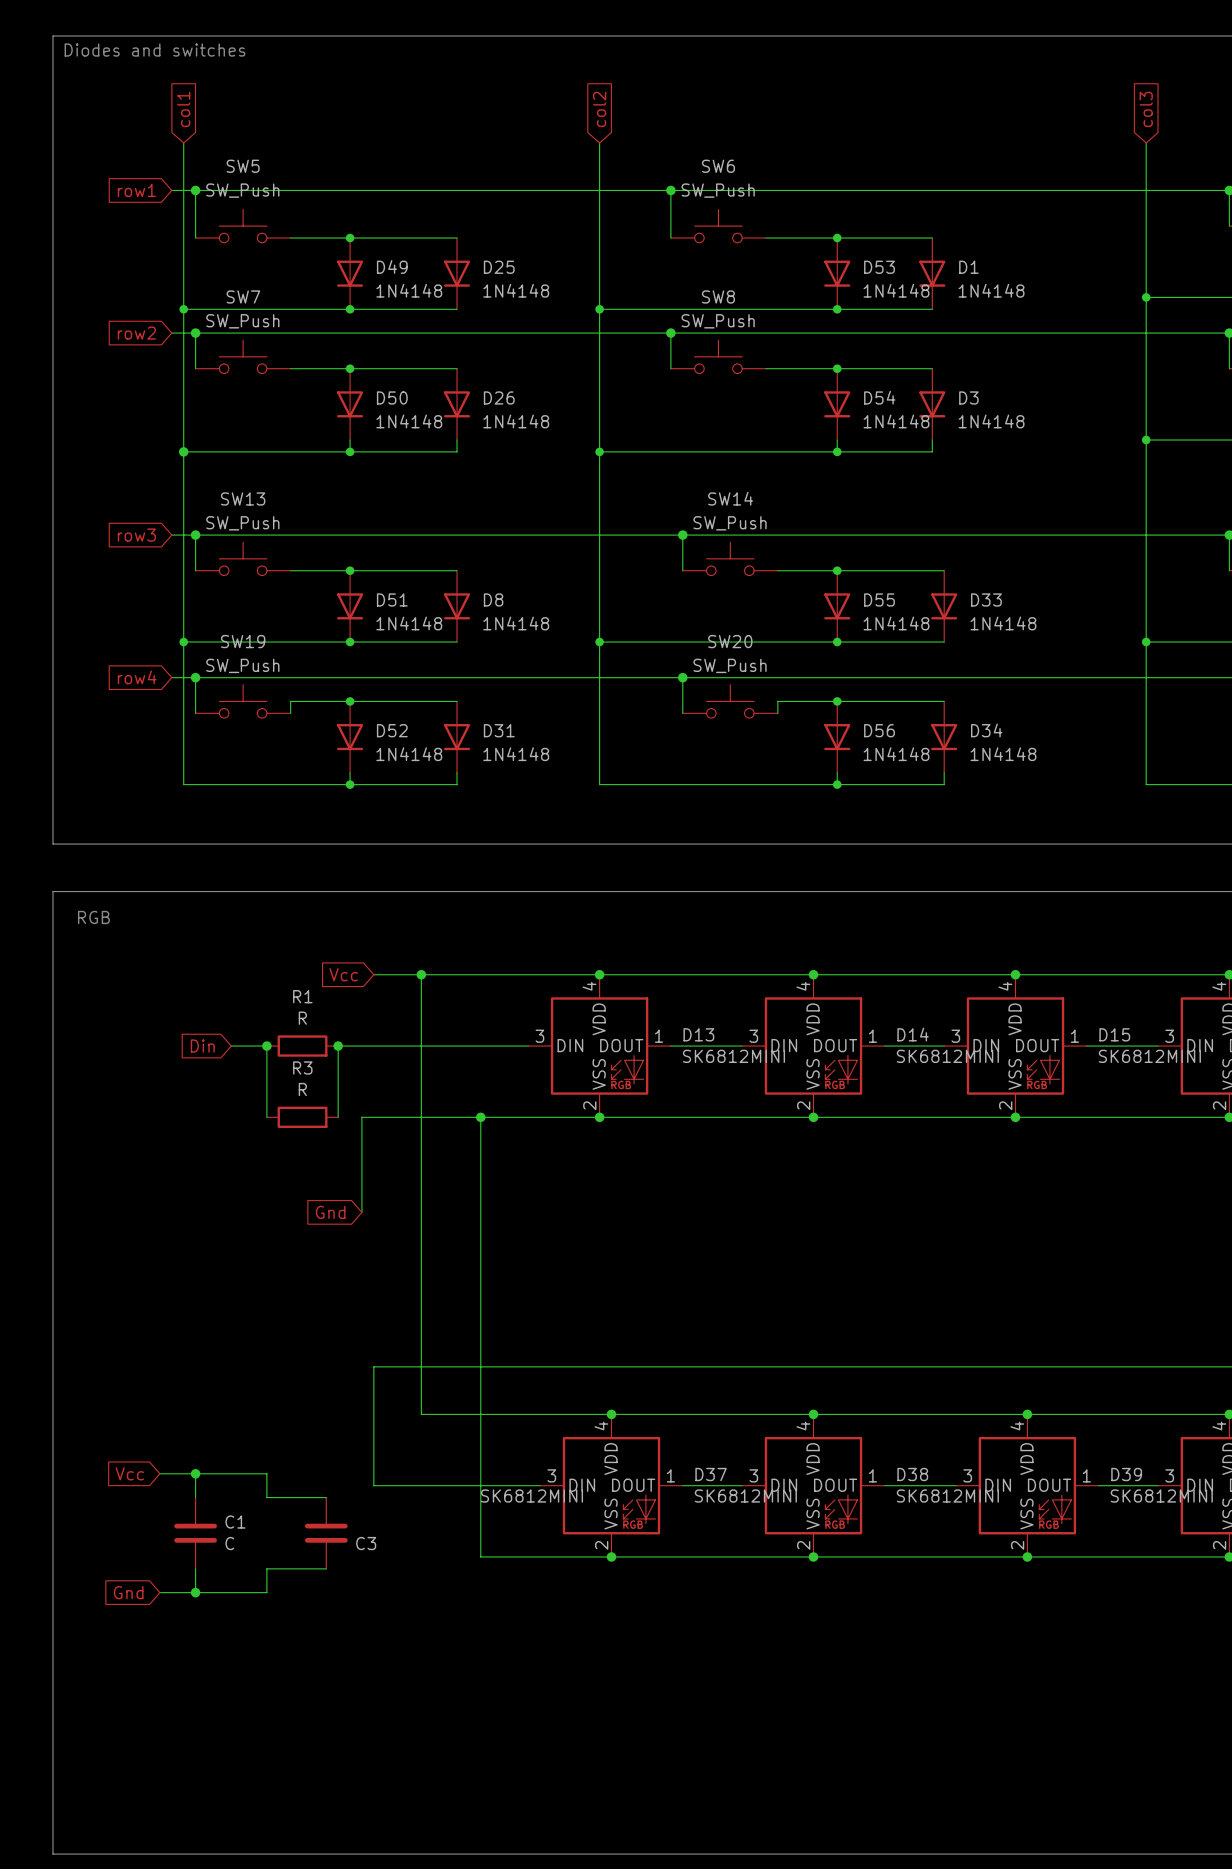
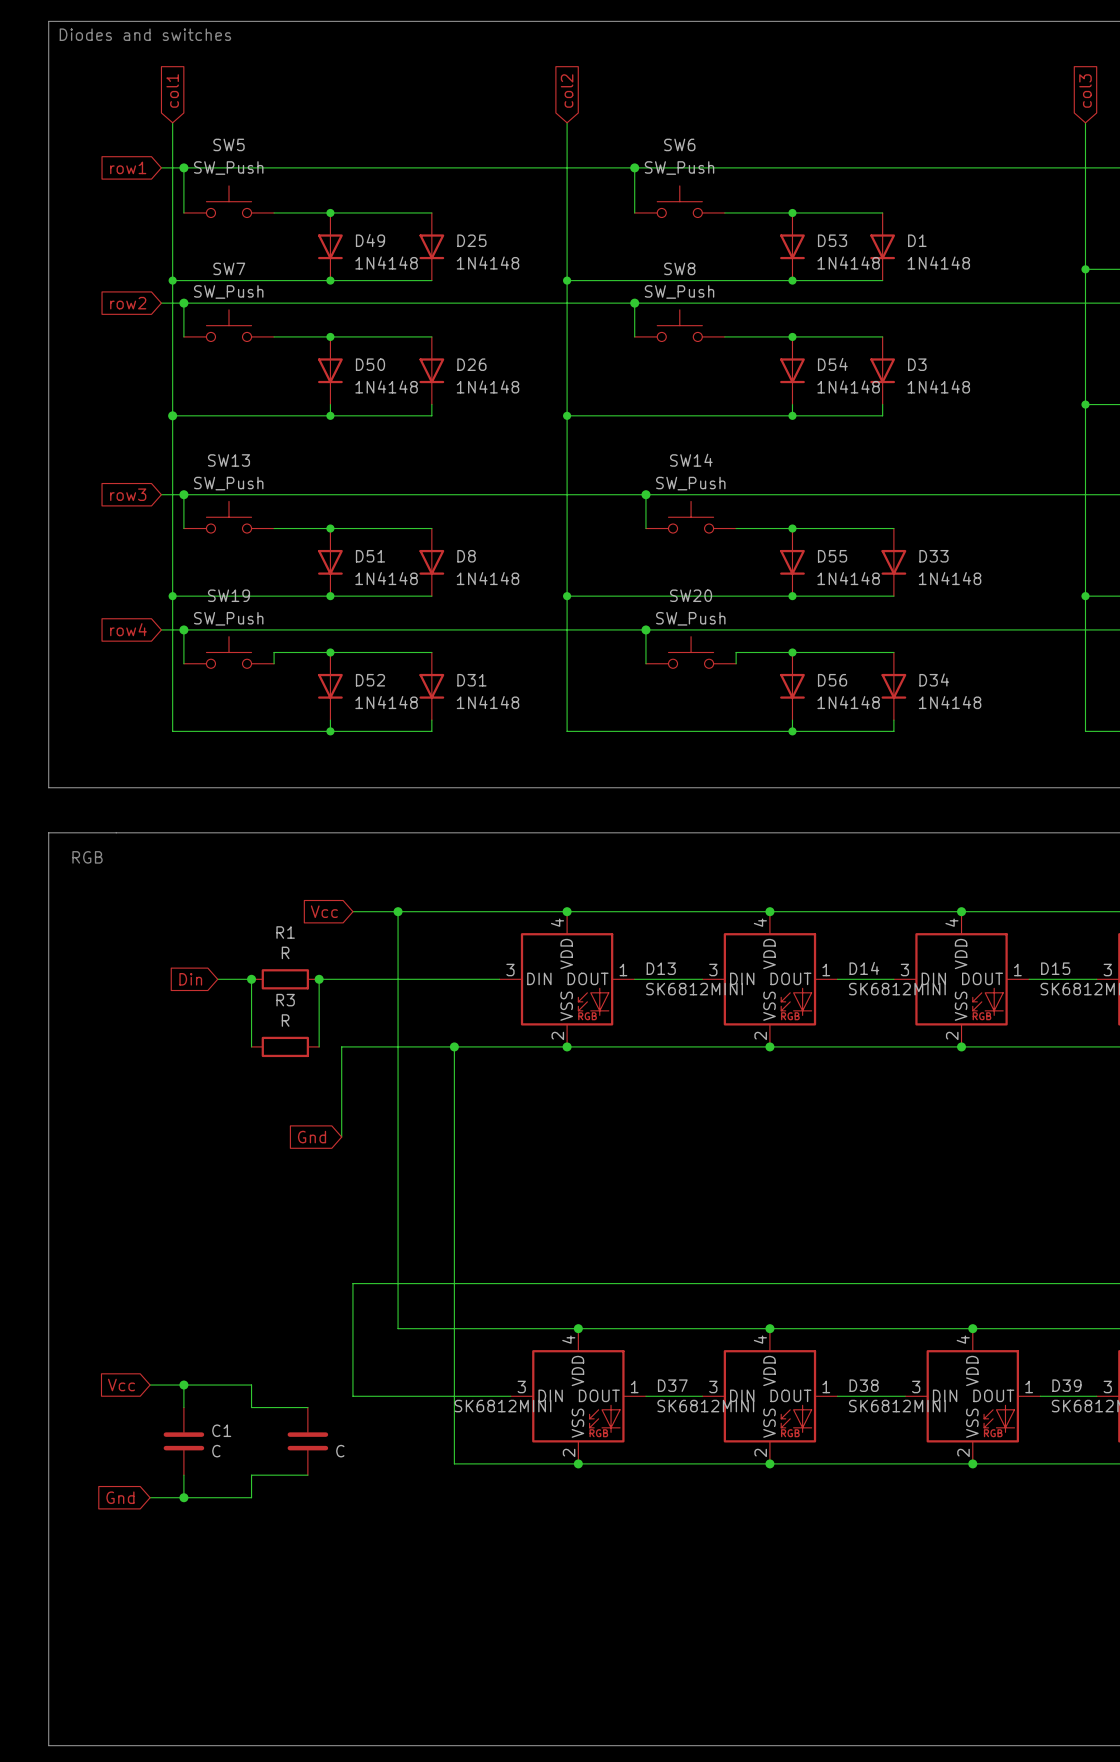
part value: C3 (366, 1543) -> C (340, 1451)

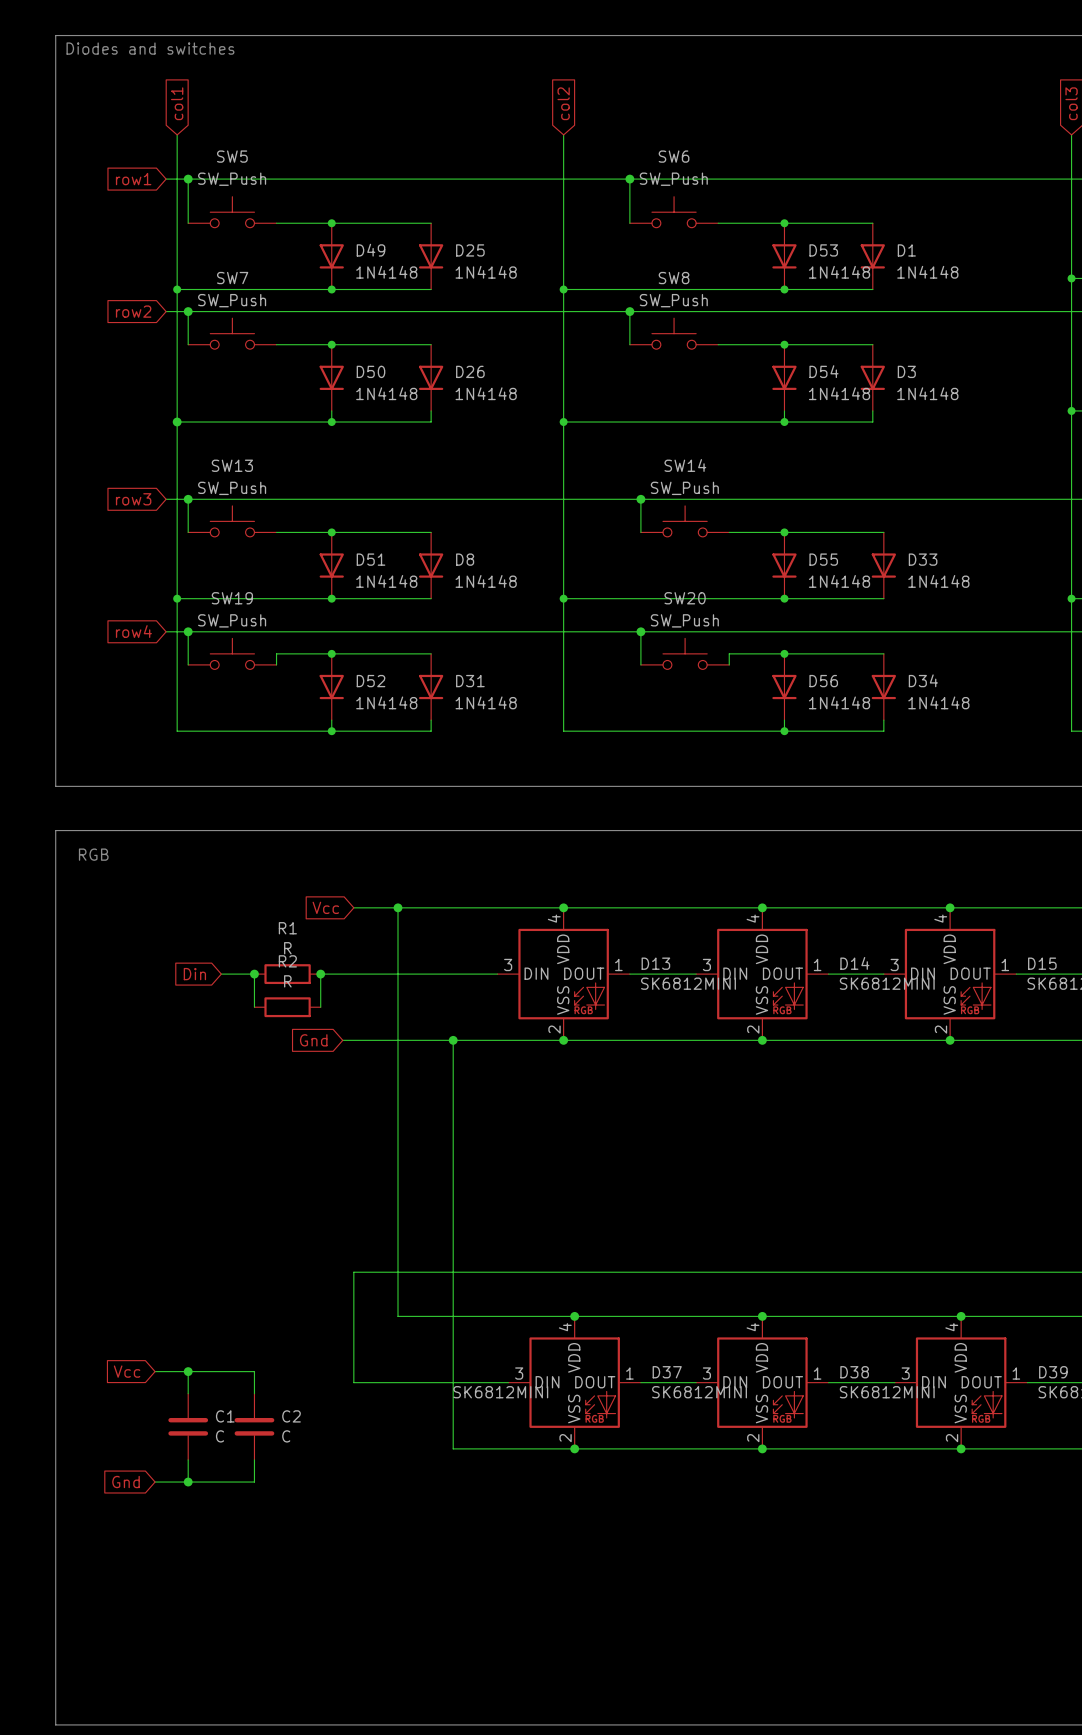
wire: (251, 1013) (251, 1046) -> none
R2: none -> R (287, 1007)
wire: (319, 1013) (319, 1046) -> none
R3: R (285, 1046) -> none
wire: (341, 1046) (341, 1137) -> none
global label position: Gnd (312, 1137) -> Gnd (313, 1040)
wire: (251, 1407) (307, 1407) -> none
C2: none -> C (254, 1426)
part: C (307, 1441) -> none
wire: (251, 1475) (307, 1475) -> none

